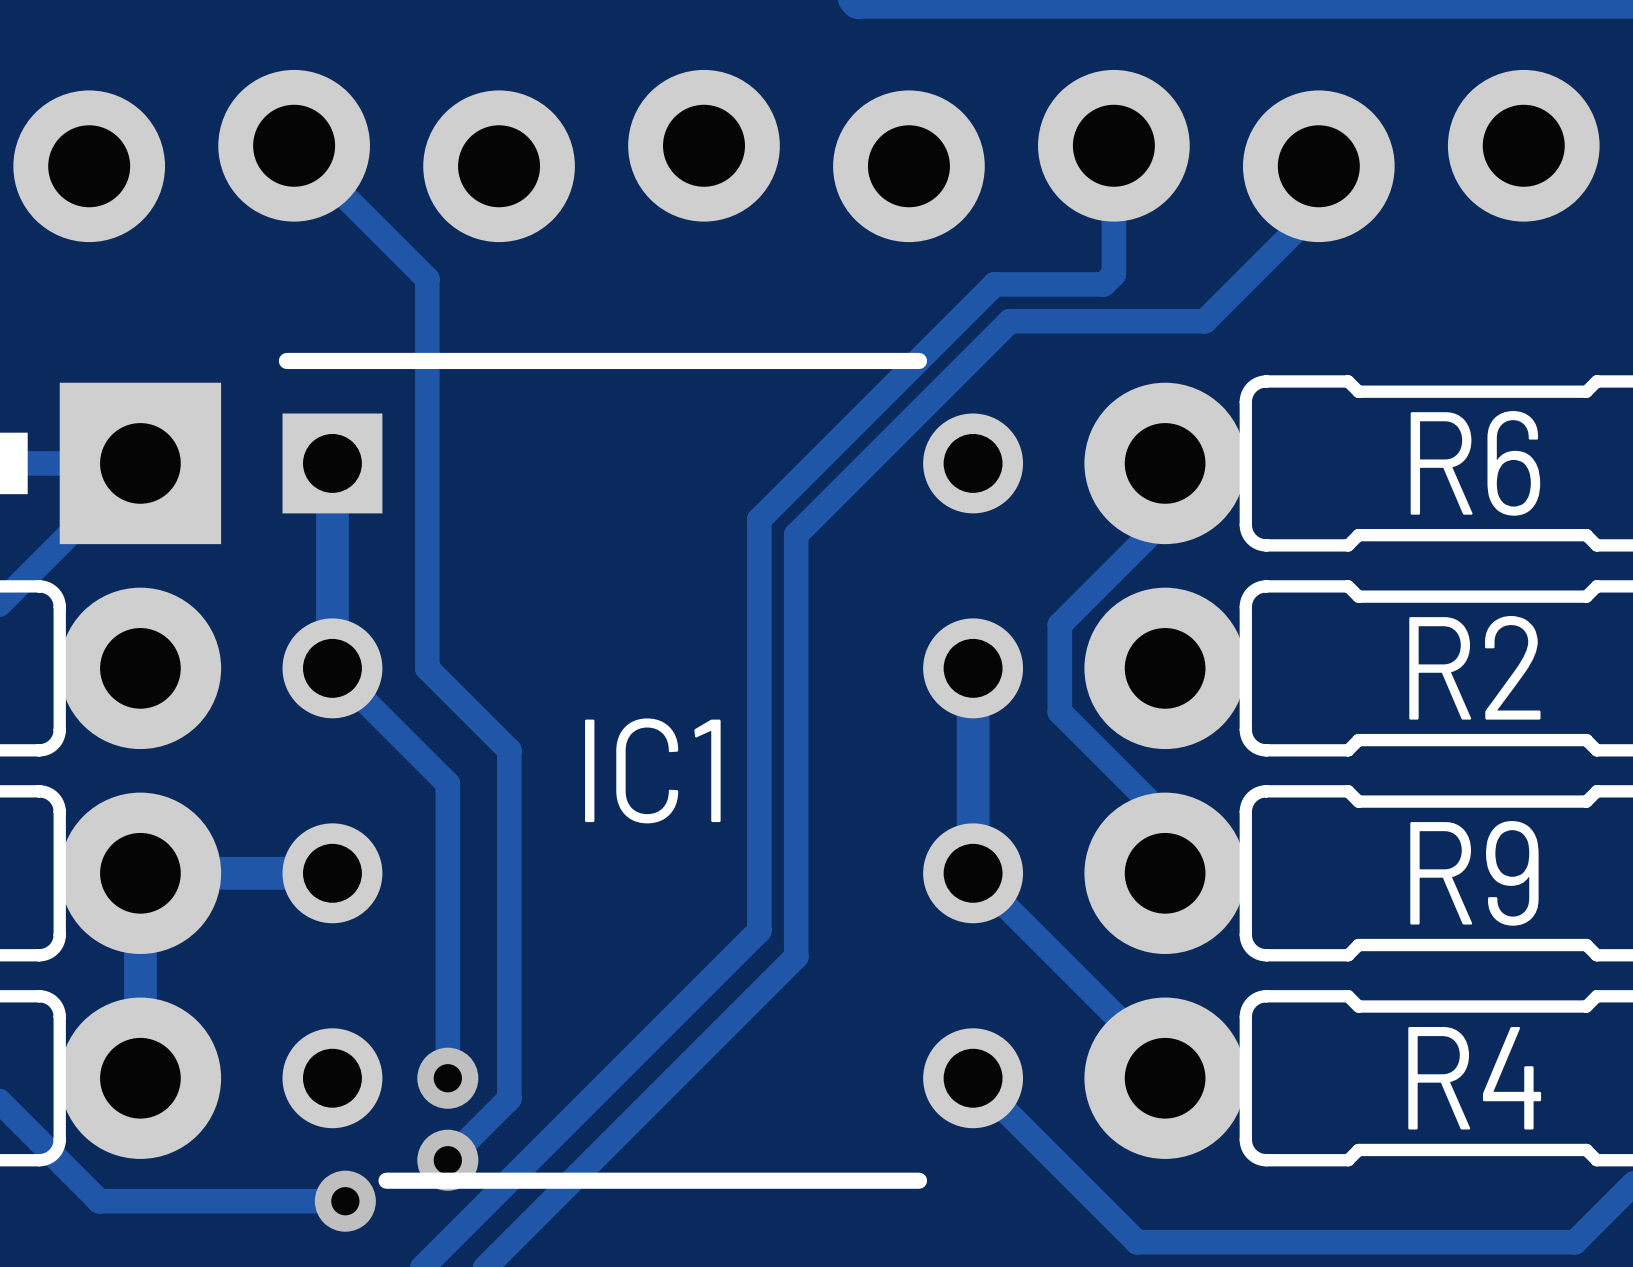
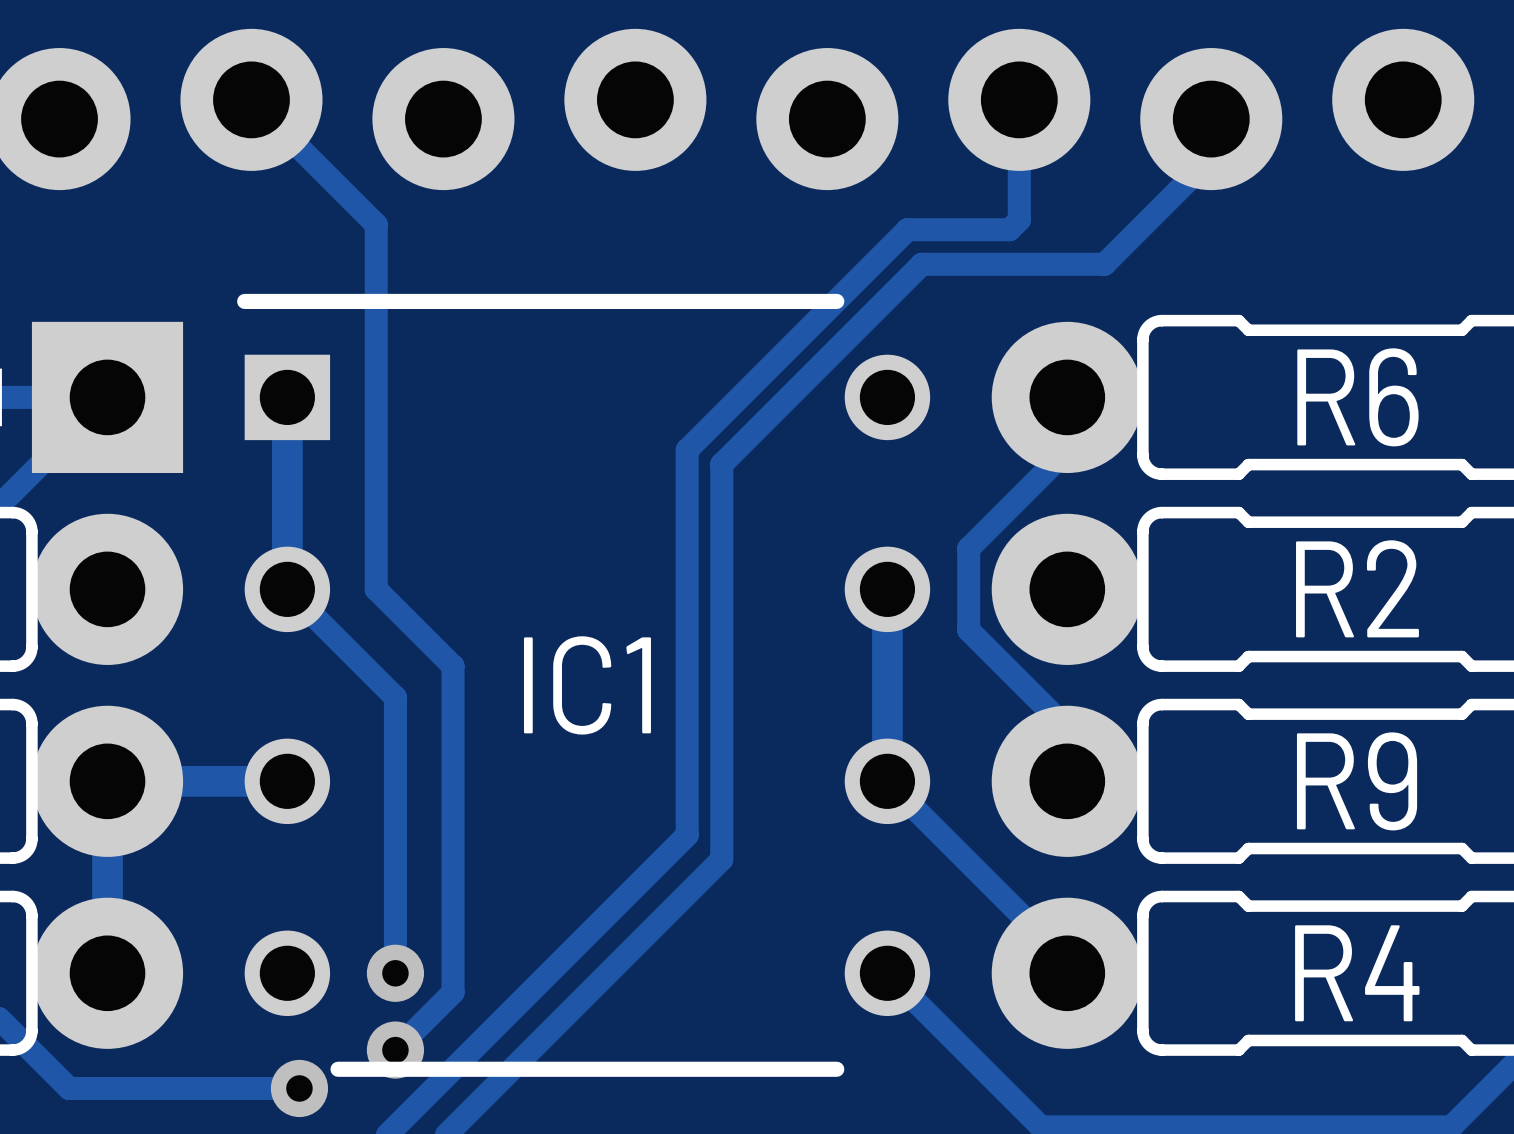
IC1 footprint: [278, 352, 1024, 1189] -> [237, 293, 931, 1077]

